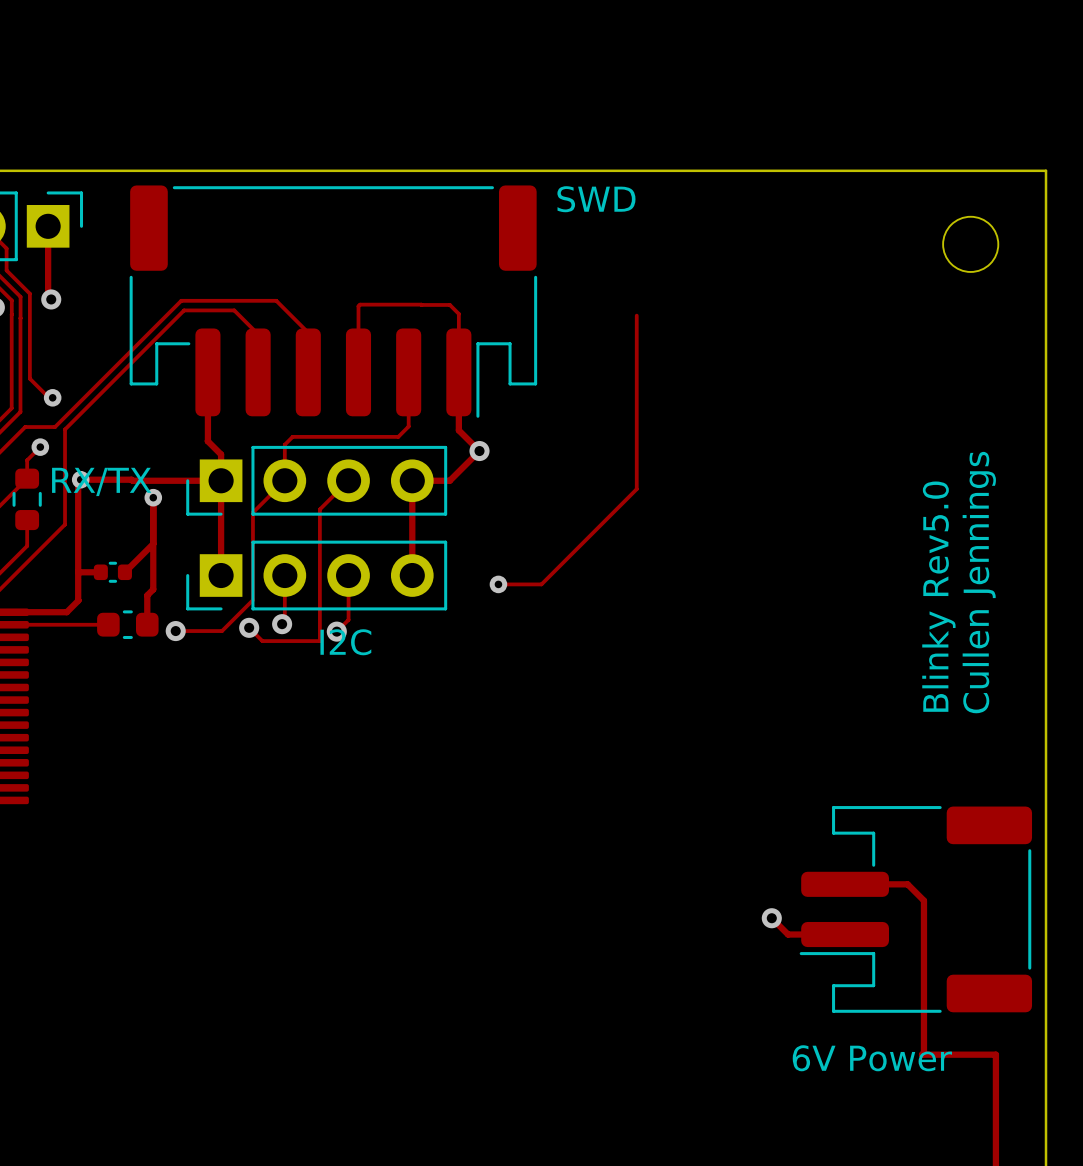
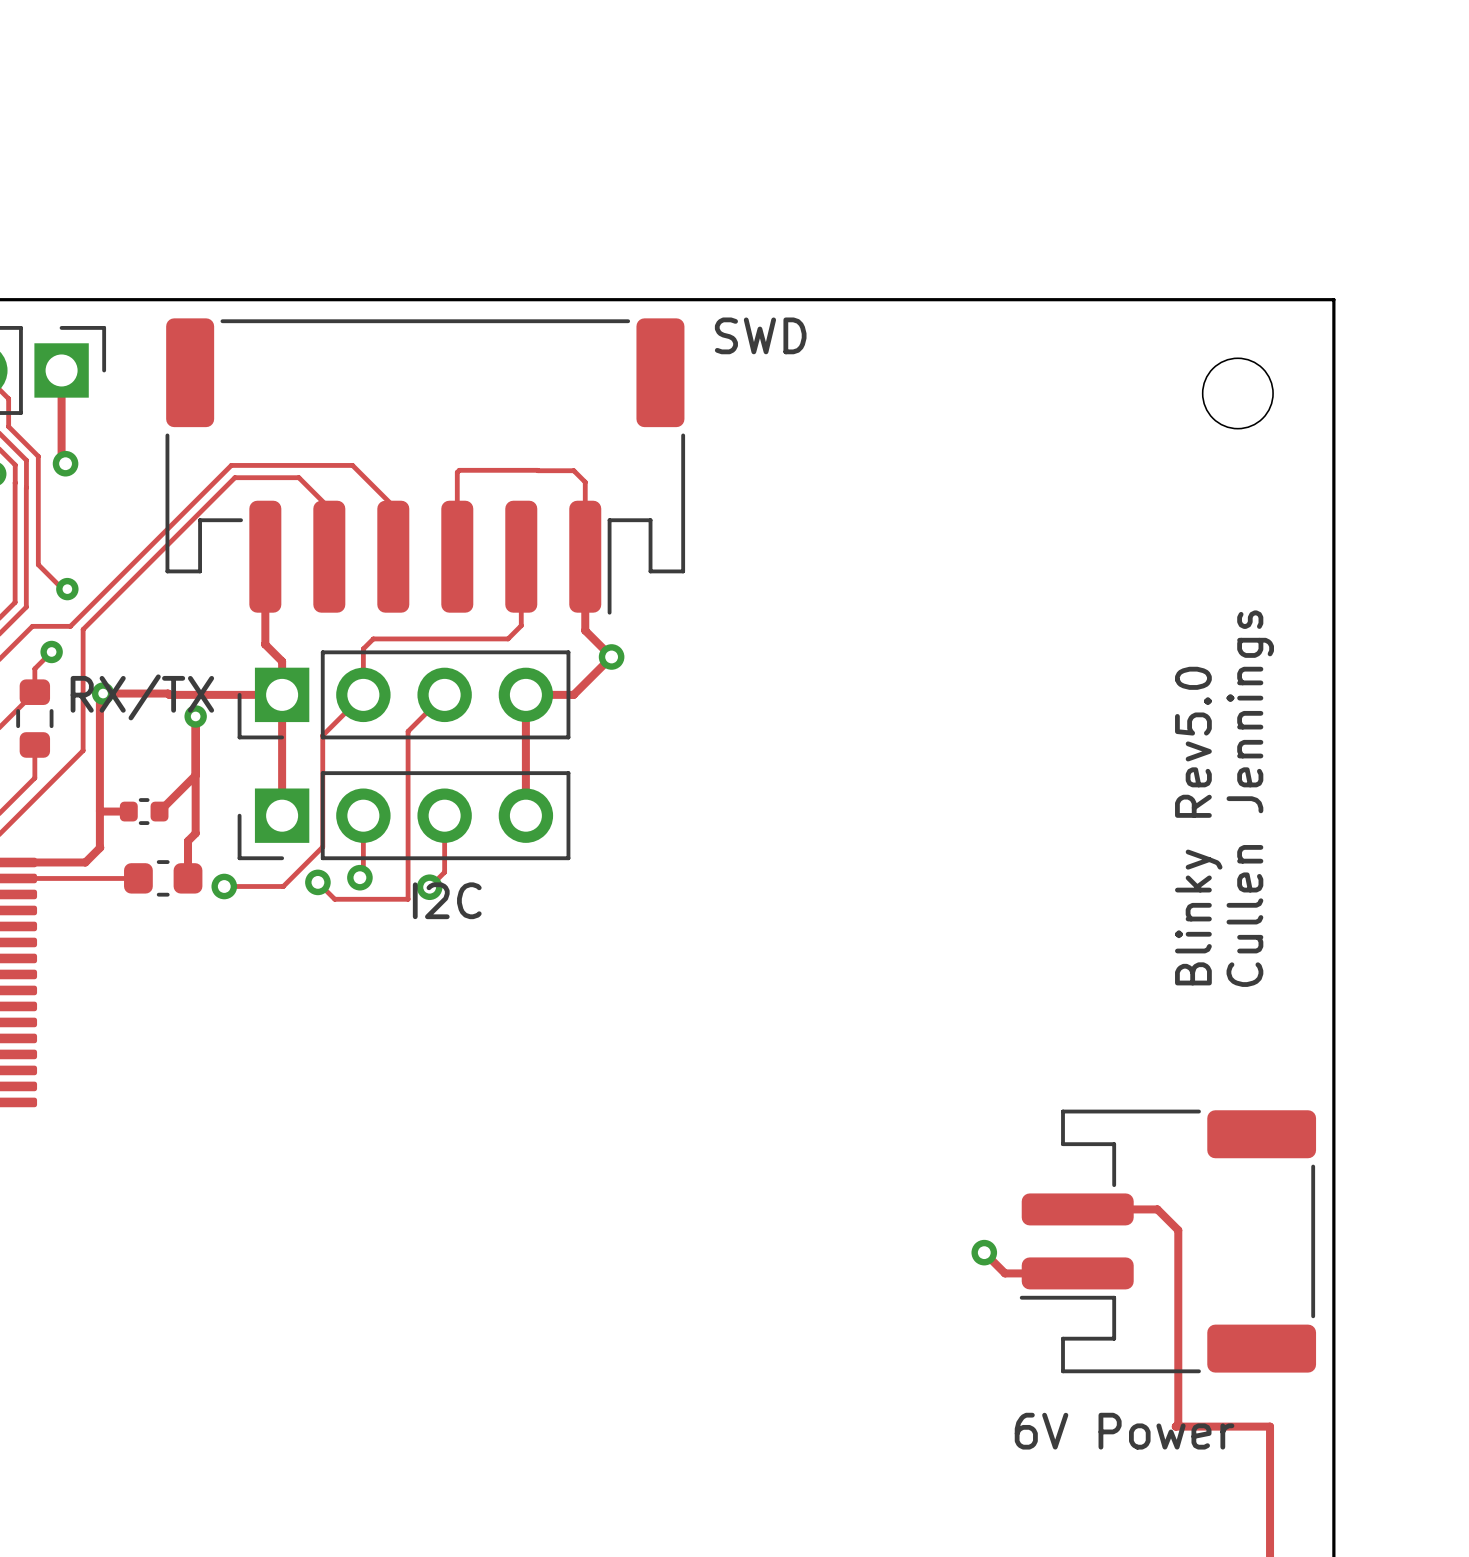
track: (636, 315) (636, 489) (541, 584) (498, 584) -> none
via: (498, 584) -> none

